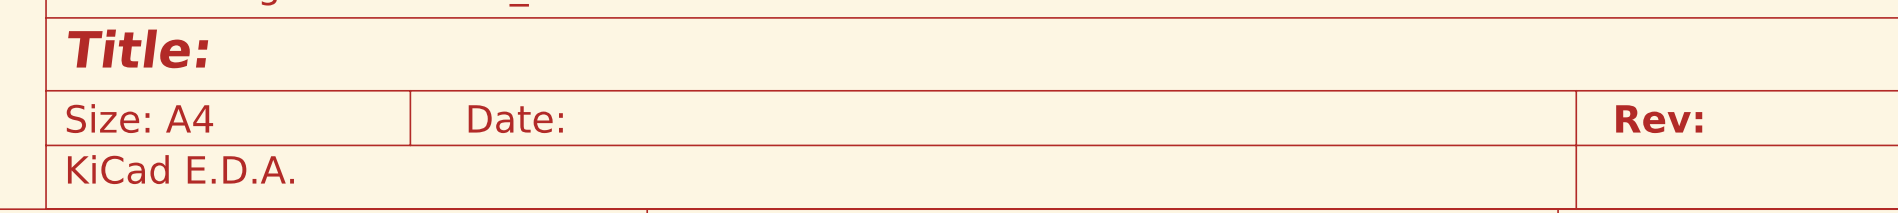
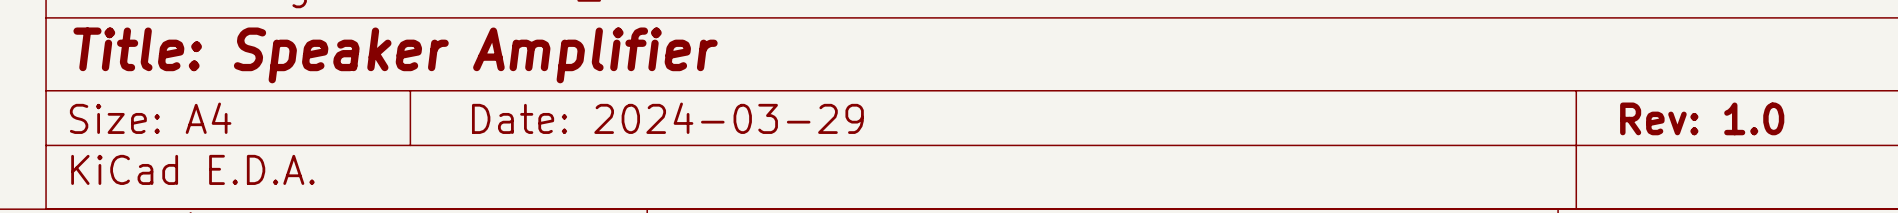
title block: Title: (138, 48) -> Title: Speaker Amplifier (395, 55)
title block: Date: (515, 119) -> Date: 2024-03-29 (667, 118)
title block: Rev: (1659, 119) -> Rev: 1.0 (1702, 118)

